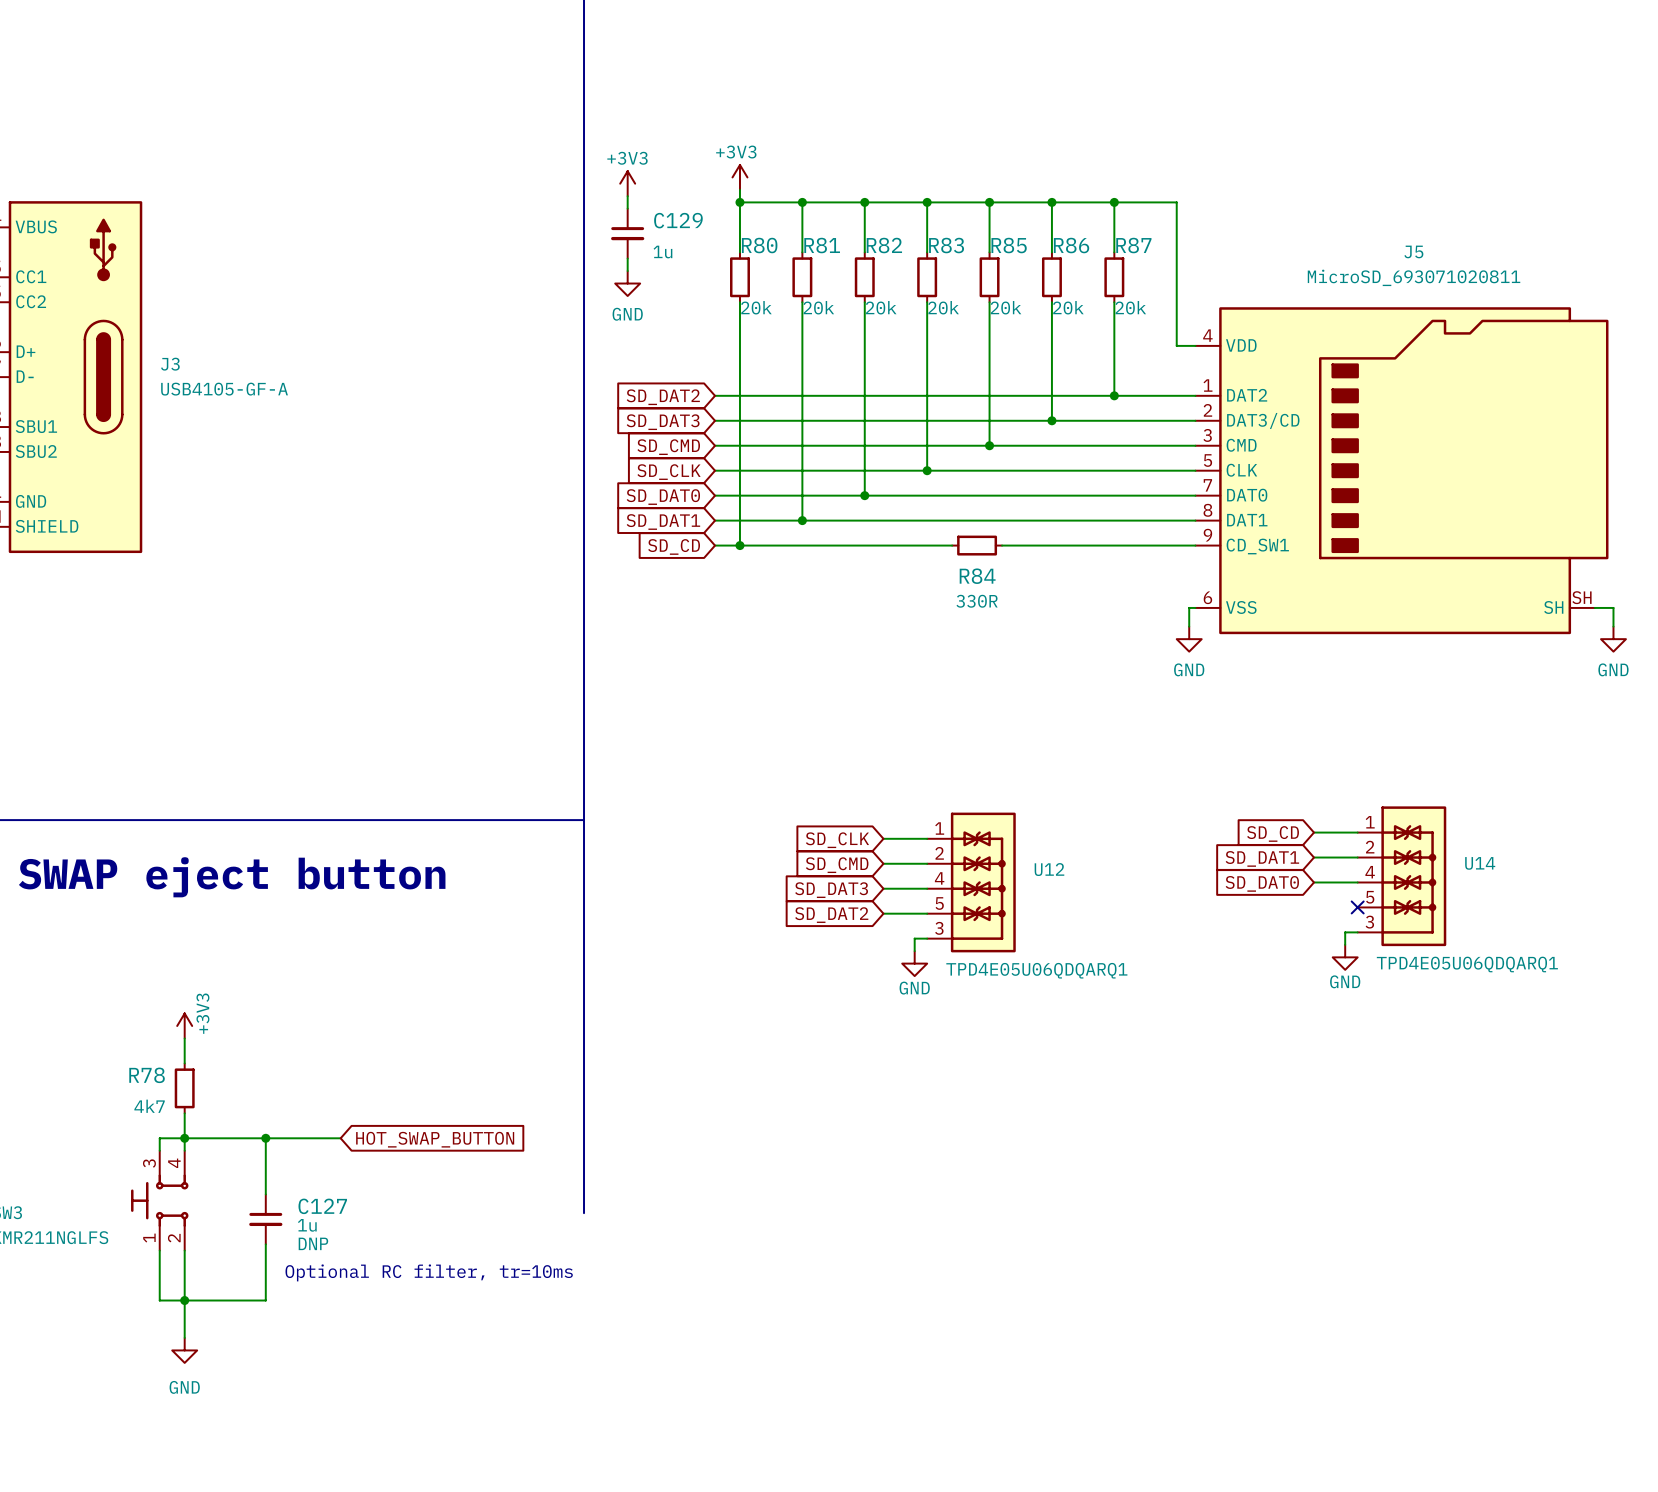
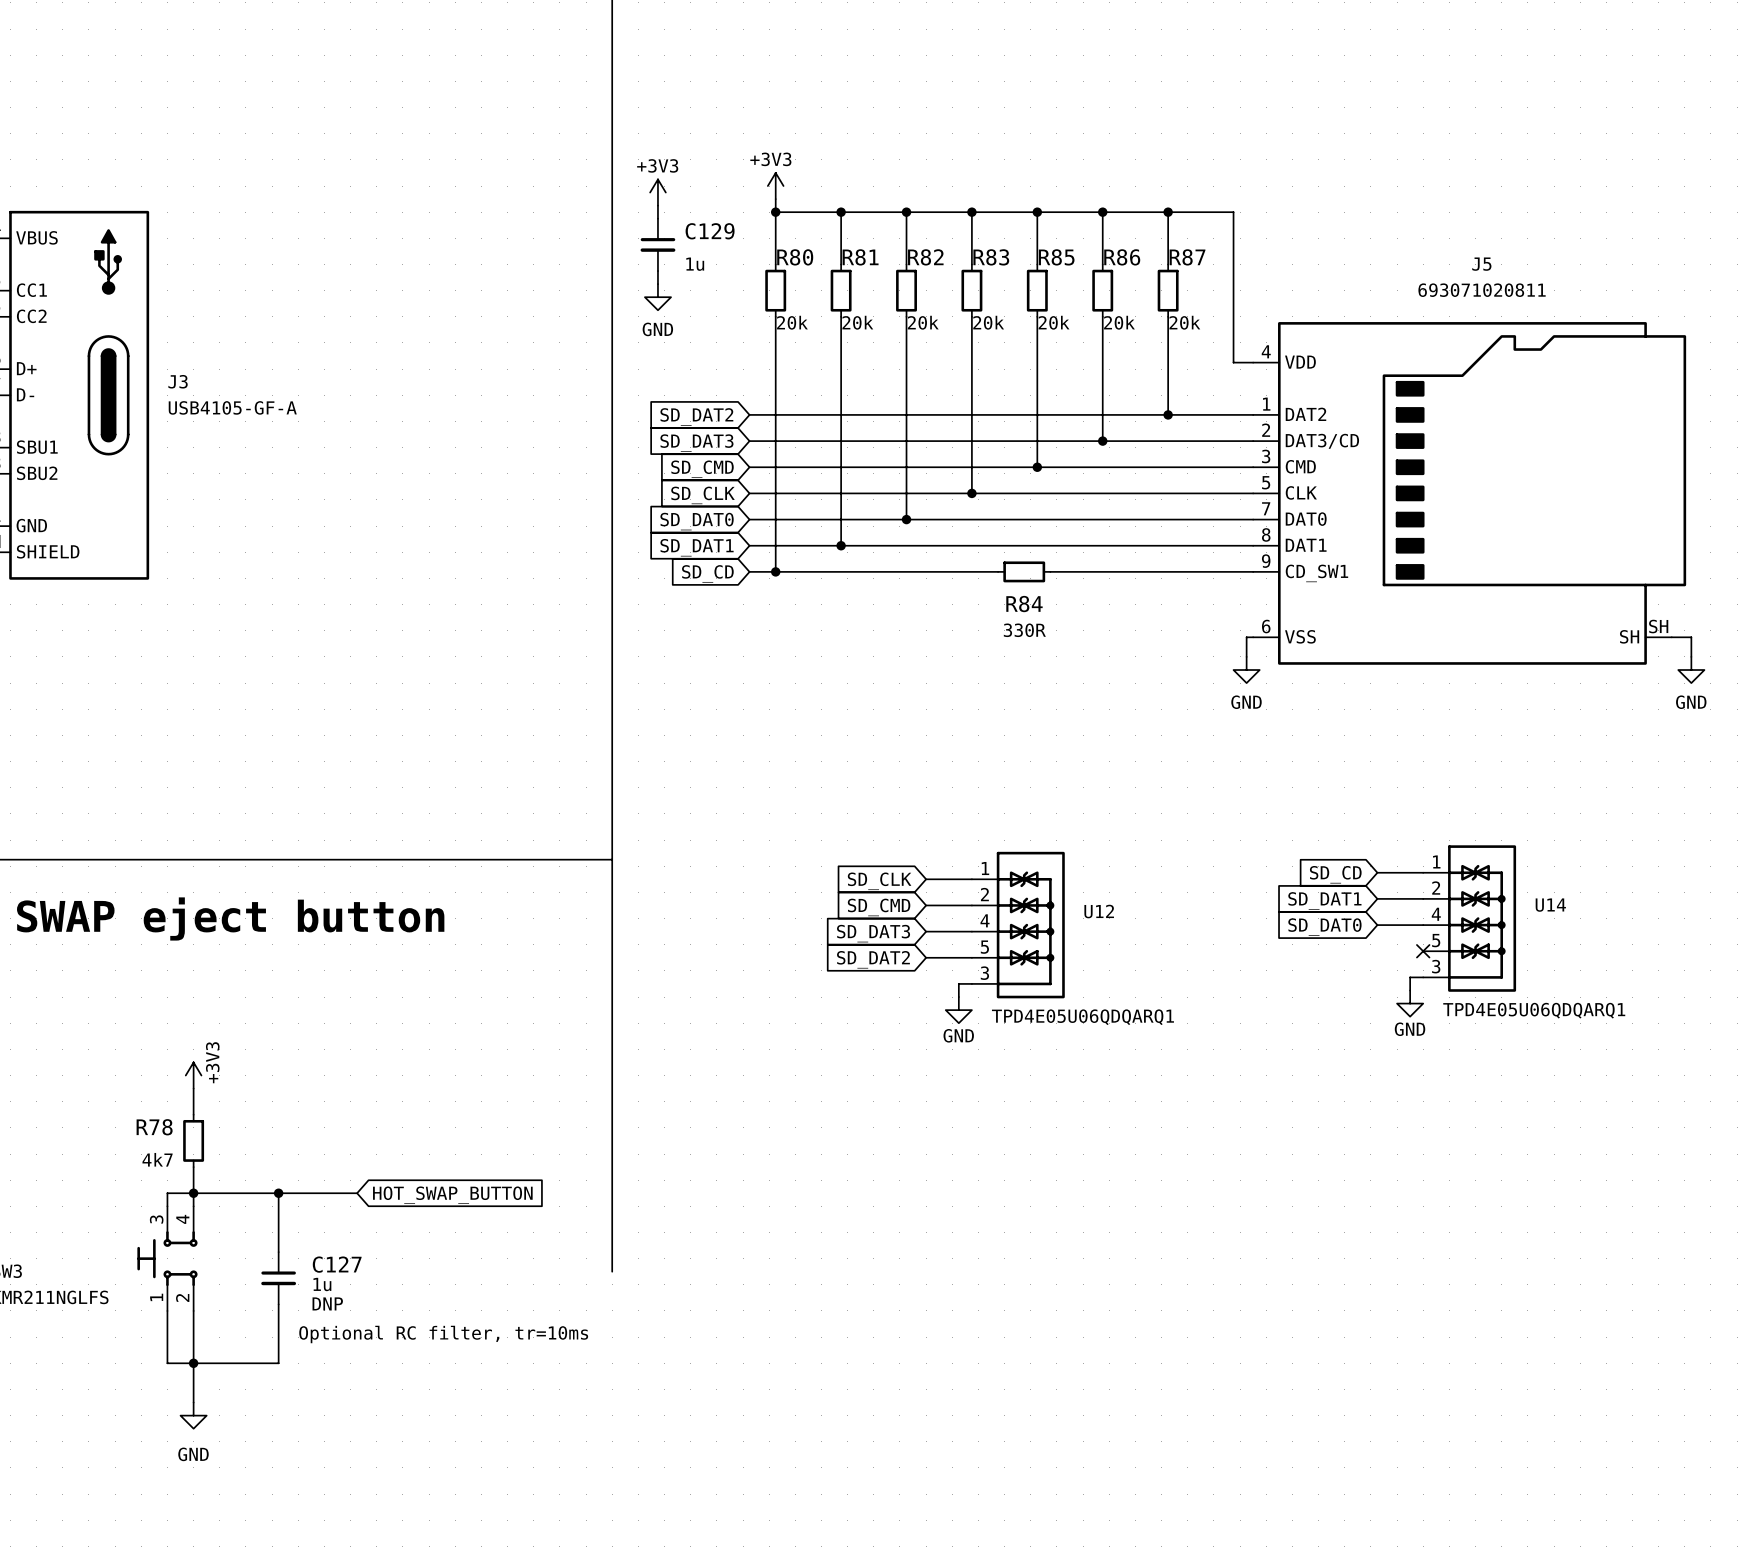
J5 text: none -> 693071020811 (1482, 290)
J5 value: MicroSD_693071020811 (1414, 277) -> none

